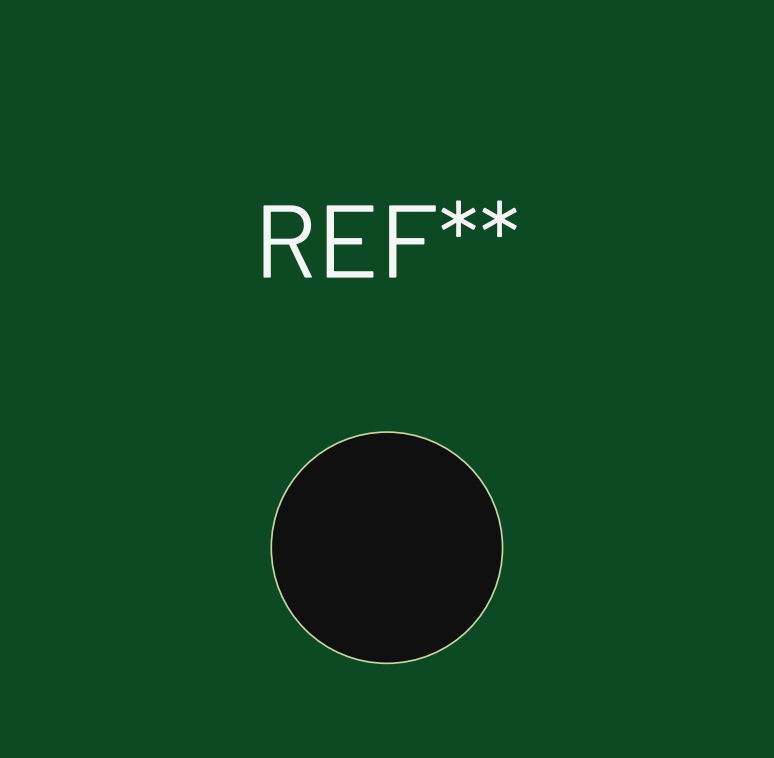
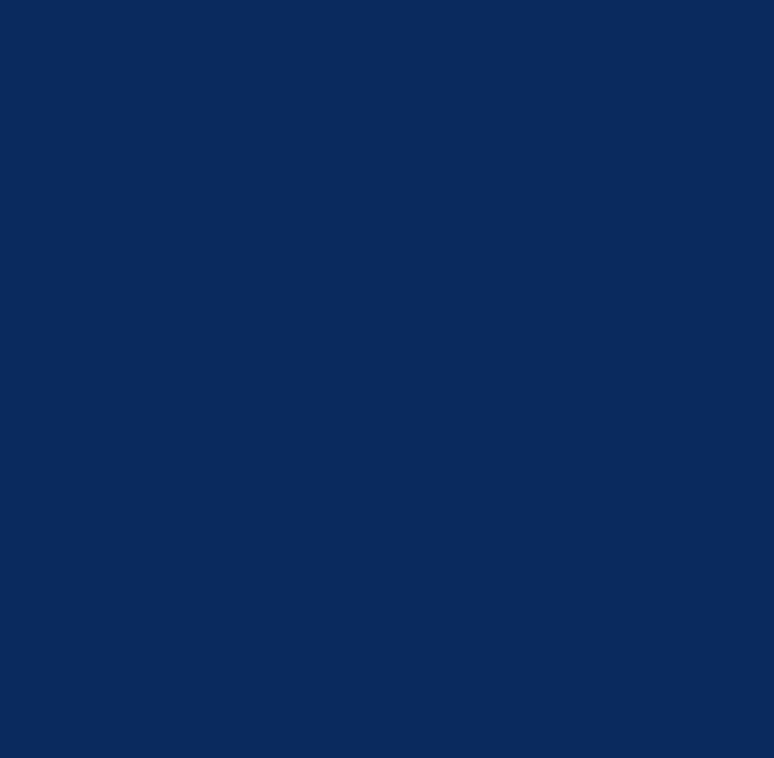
REF**: (386, 547) -> none

